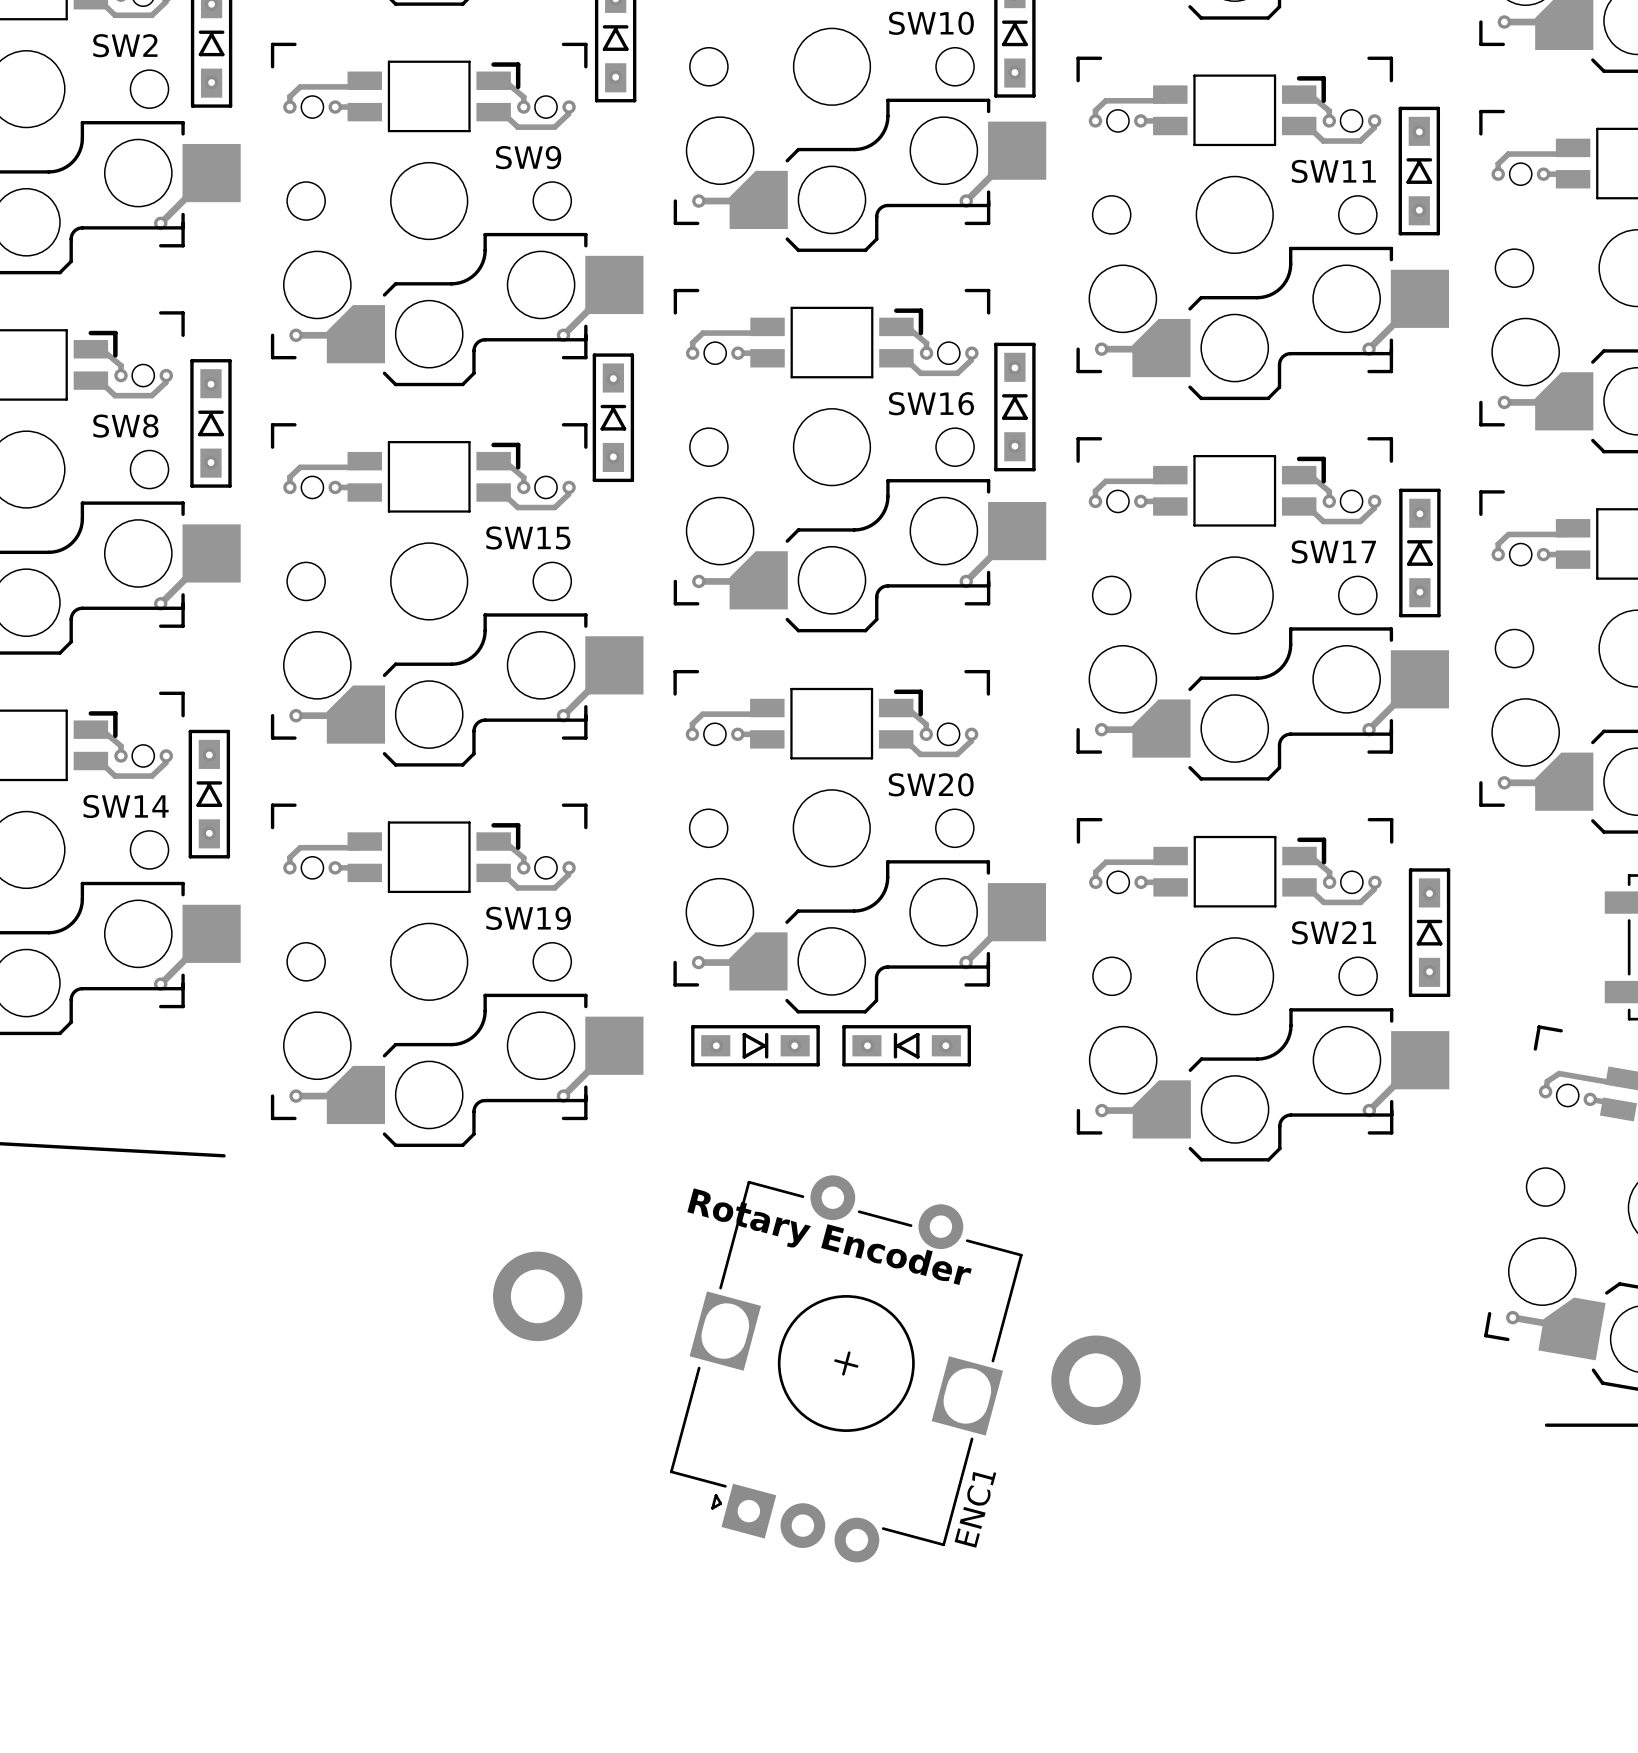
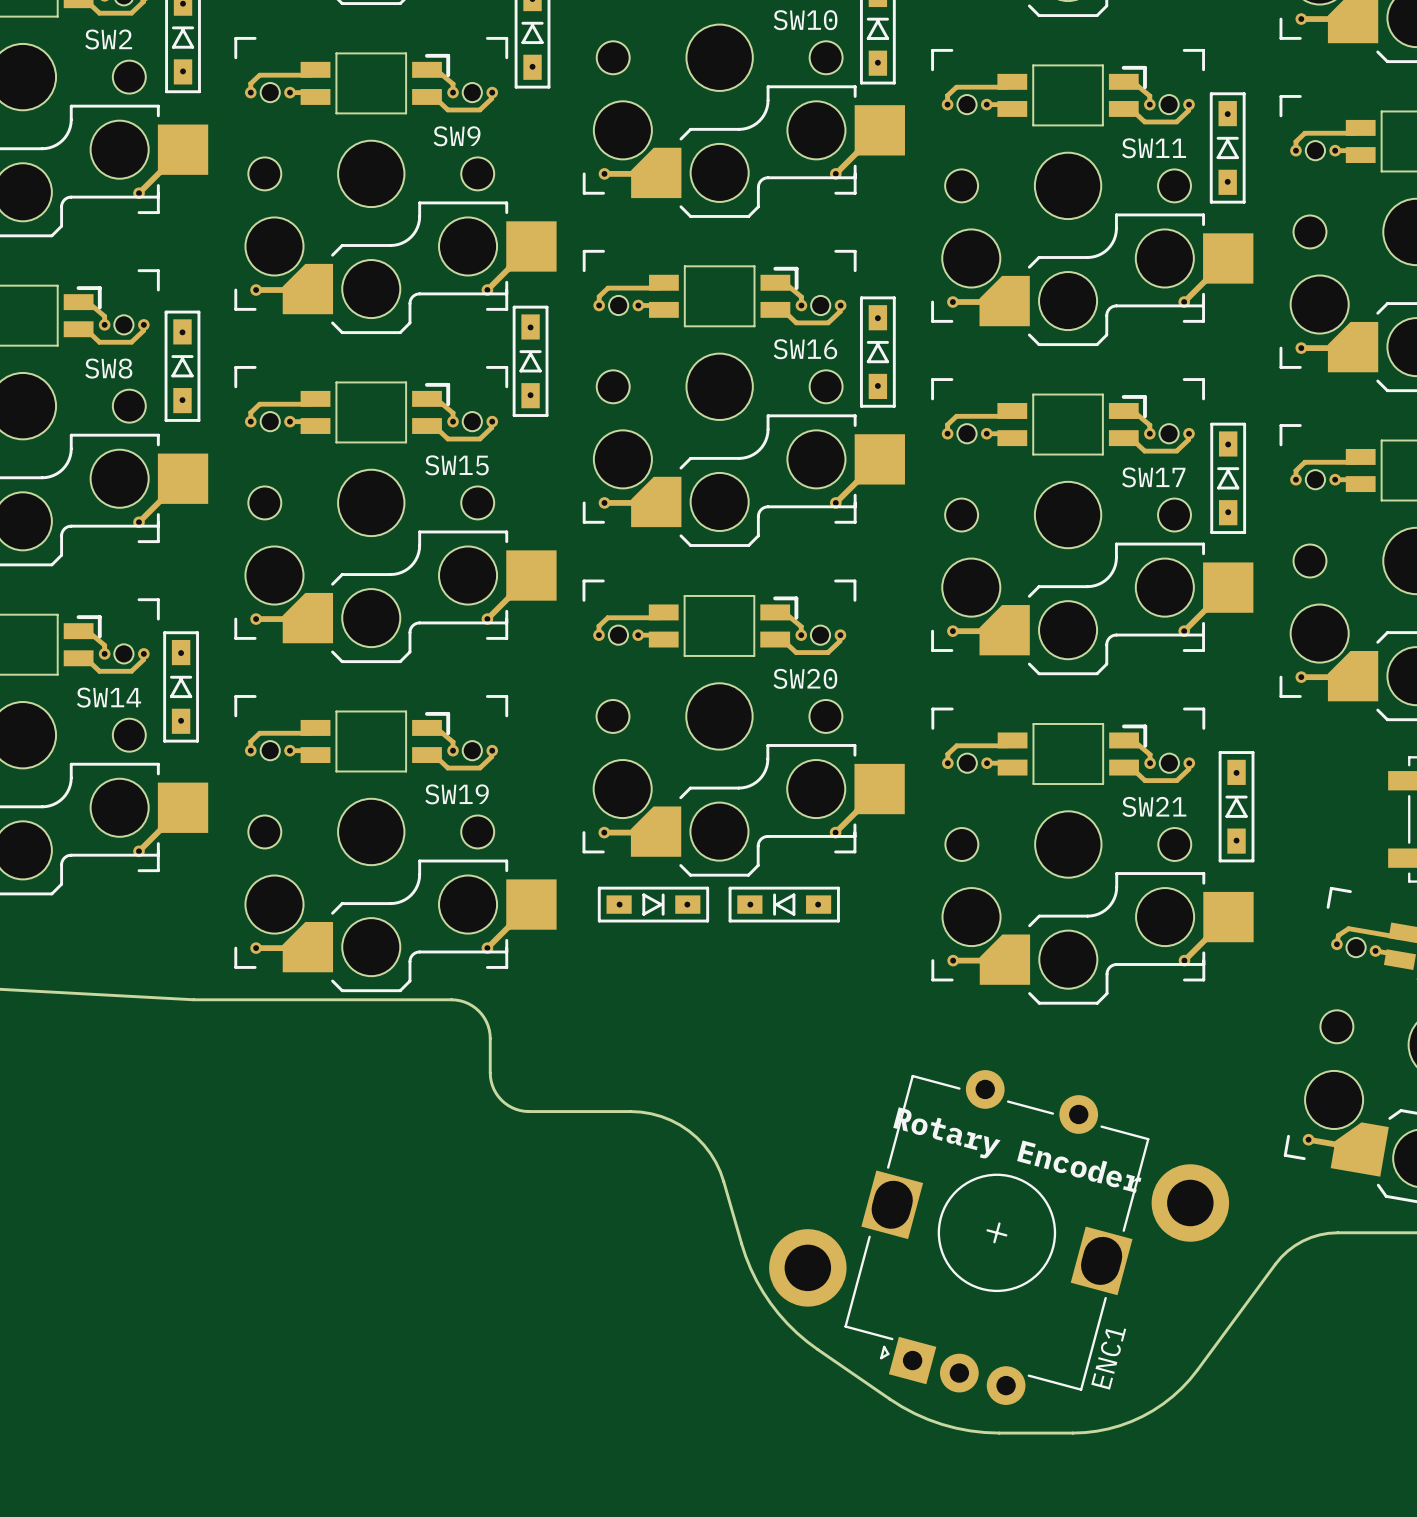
board edge: none -> (193, 999) (451, 999) (472, 1005) (481, 1014) (488, 1025) (491, 1081) (496, 1093) (504, 1103) (524, 1111) (641, 1112) (661, 1116) (688, 1131) (704, 1145) (715, 1162) (750, 1268) (770, 1303) (787, 1323) (817, 1349) (901, 1406) (928, 1419) (955, 1428) (999, 1433) (1084, 1432) (1120, 1425) (1142, 1416) (1172, 1396) (1189, 1379) (1275, 1264) (1287, 1251) (1311, 1237) (1337, 1232)
text position: Rotary Encoder (829, 1236) -> Rotary Encoder (1017, 1150)
part: (537, 1296) -> none
ENC1 position: (846, 1368) -> (996, 1237)
part: (1096, 1380) -> none
part: none -> (1190, 1202)
part: none -> (807, 1267)

